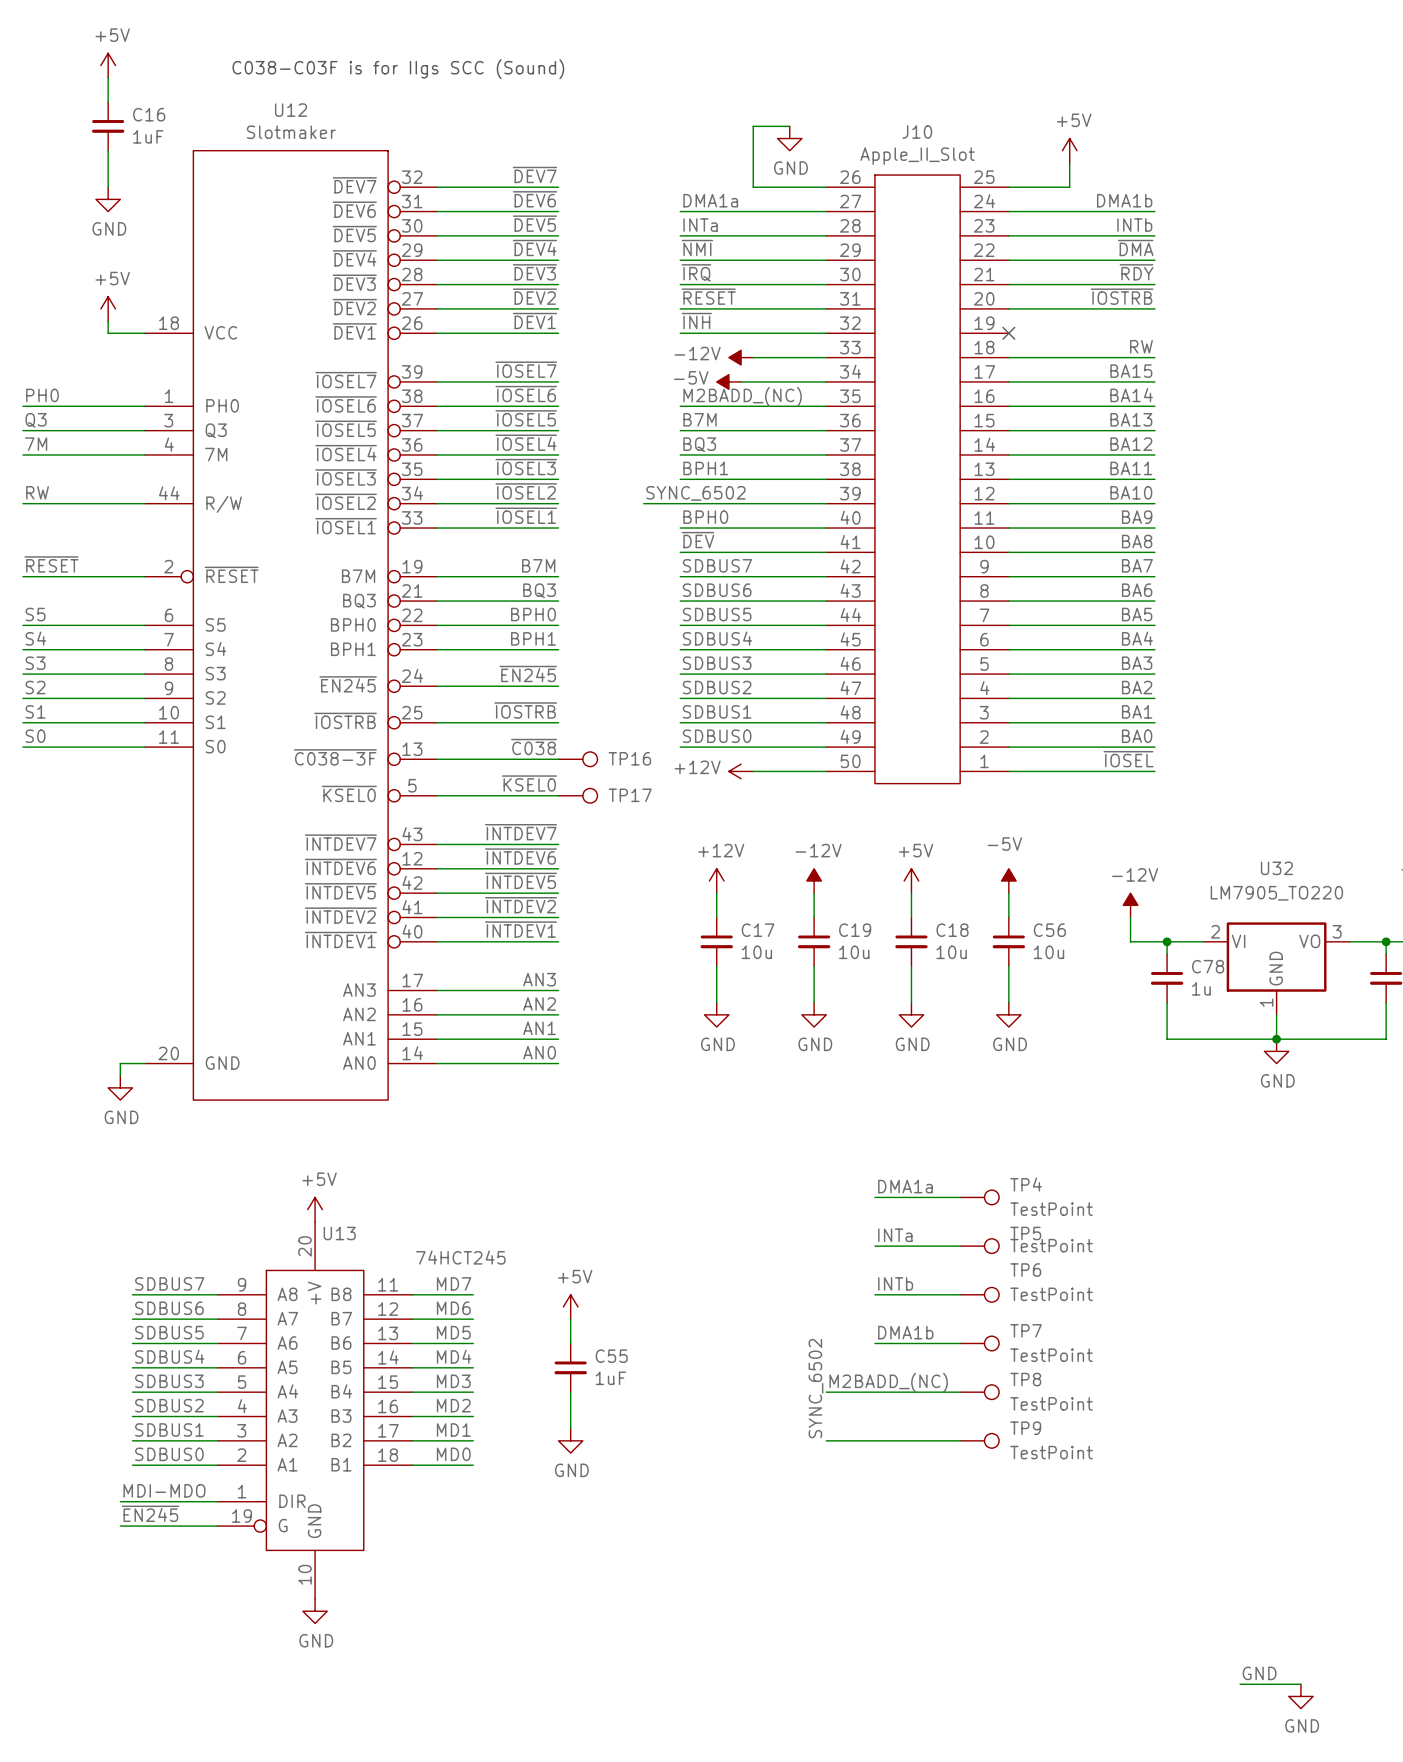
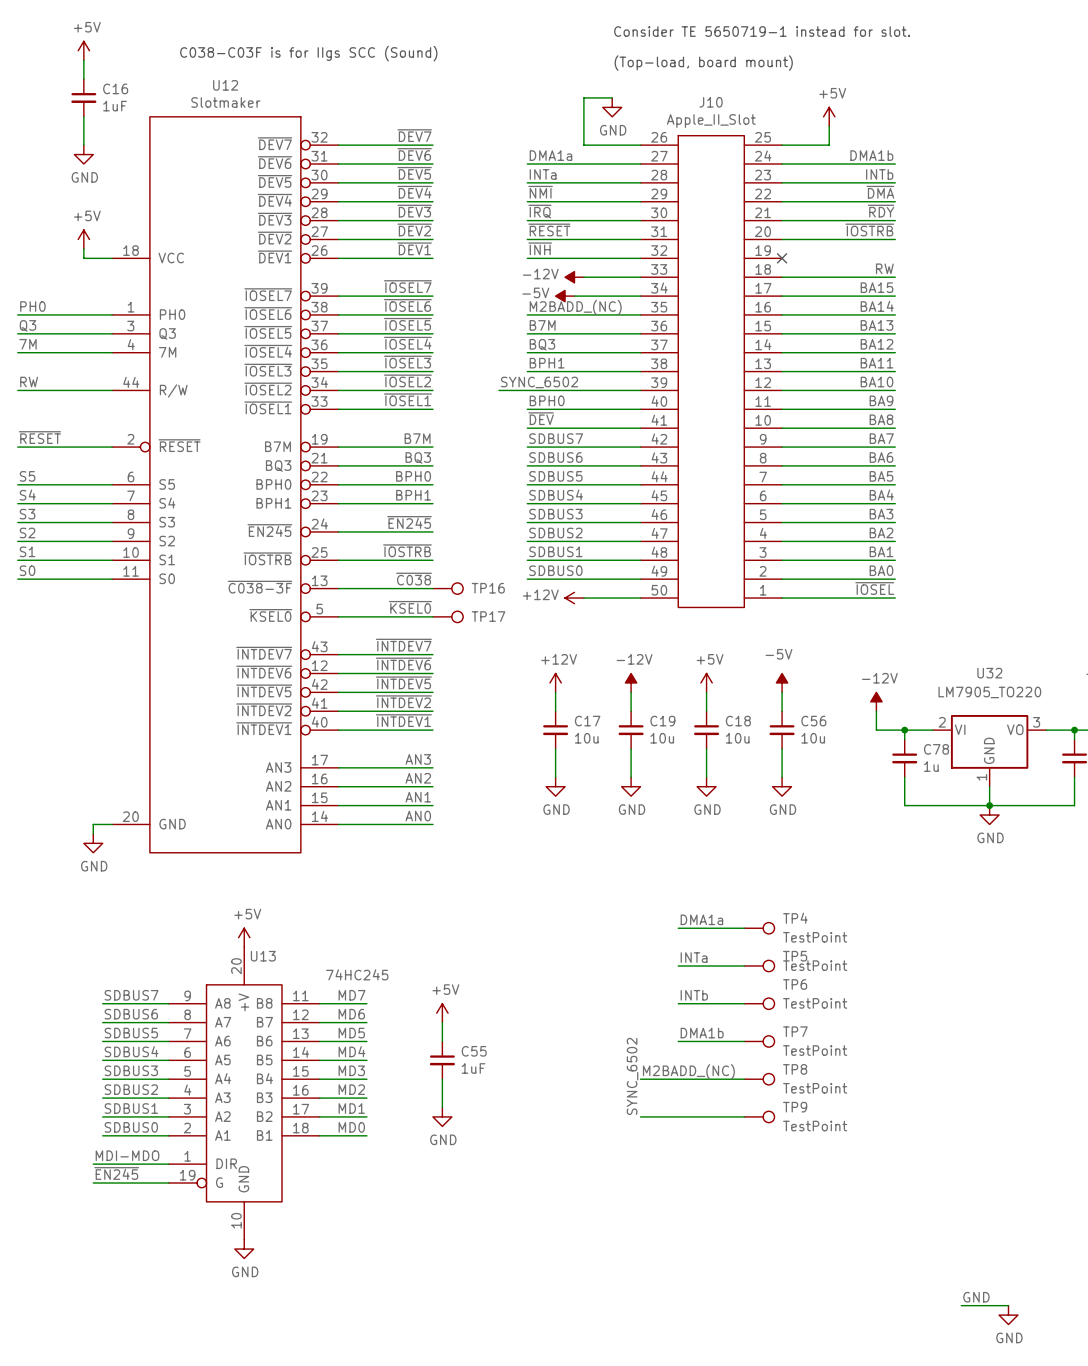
text: none -> Consider TE 5650719-1 instead for slot. (762, 31)
text: none -> (Top-load, board mount) (703, 63)
U13 value: 74HCT245 (460, 1257) -> 74HC245 (357, 974)

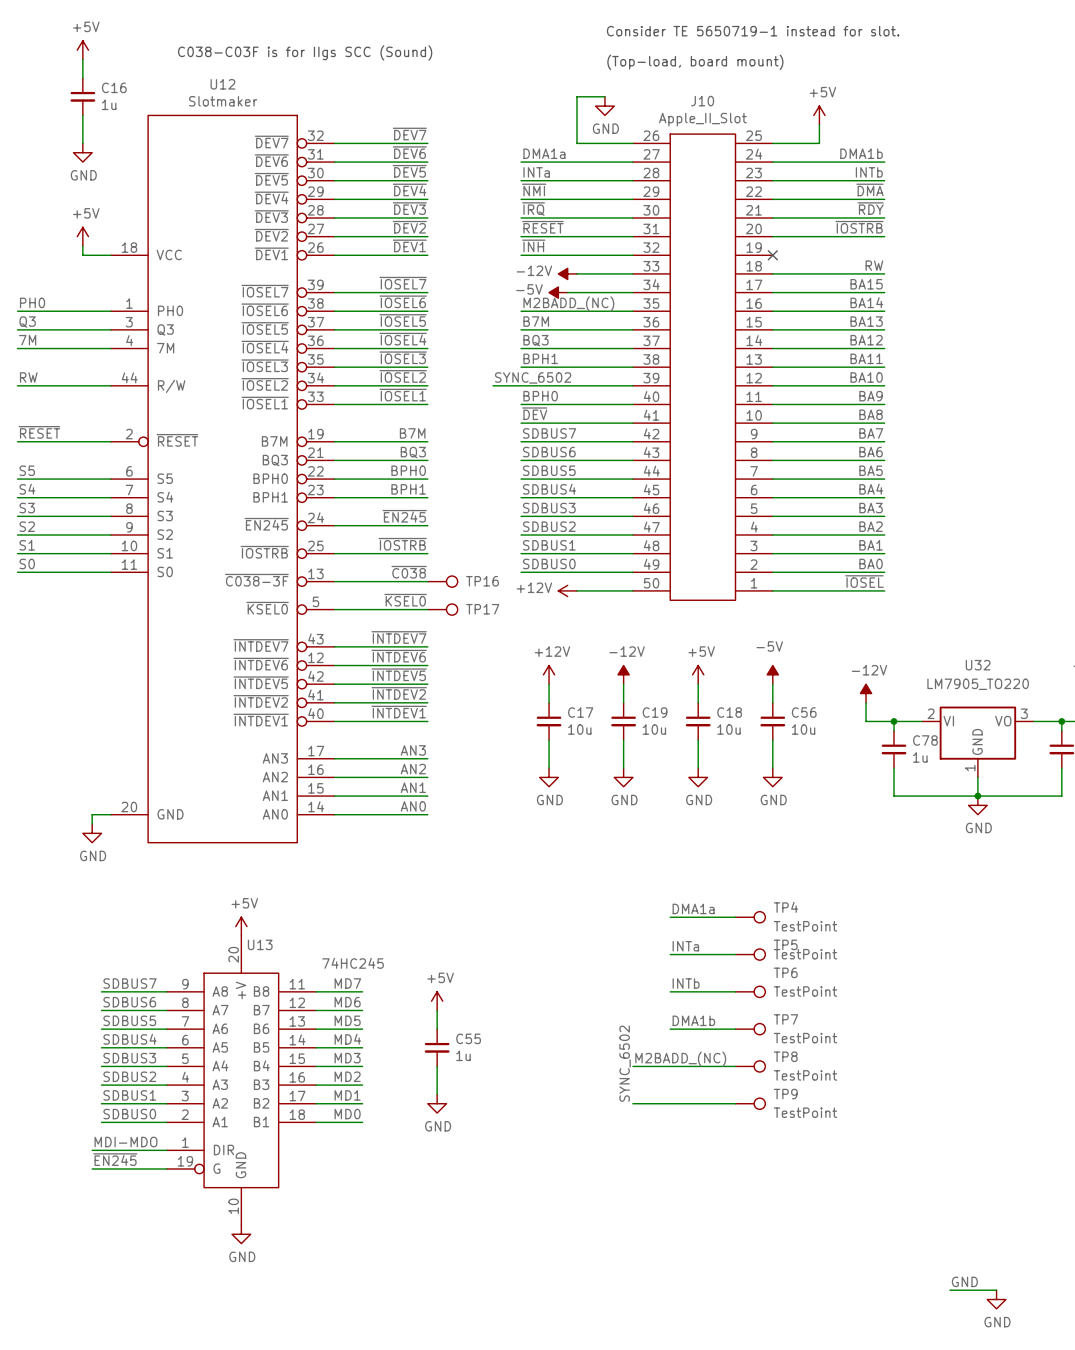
C16 value: 1uF (114, 106) -> 1u (109, 104)
C55 value: 1uF (473, 1068) -> 1u (463, 1055)

